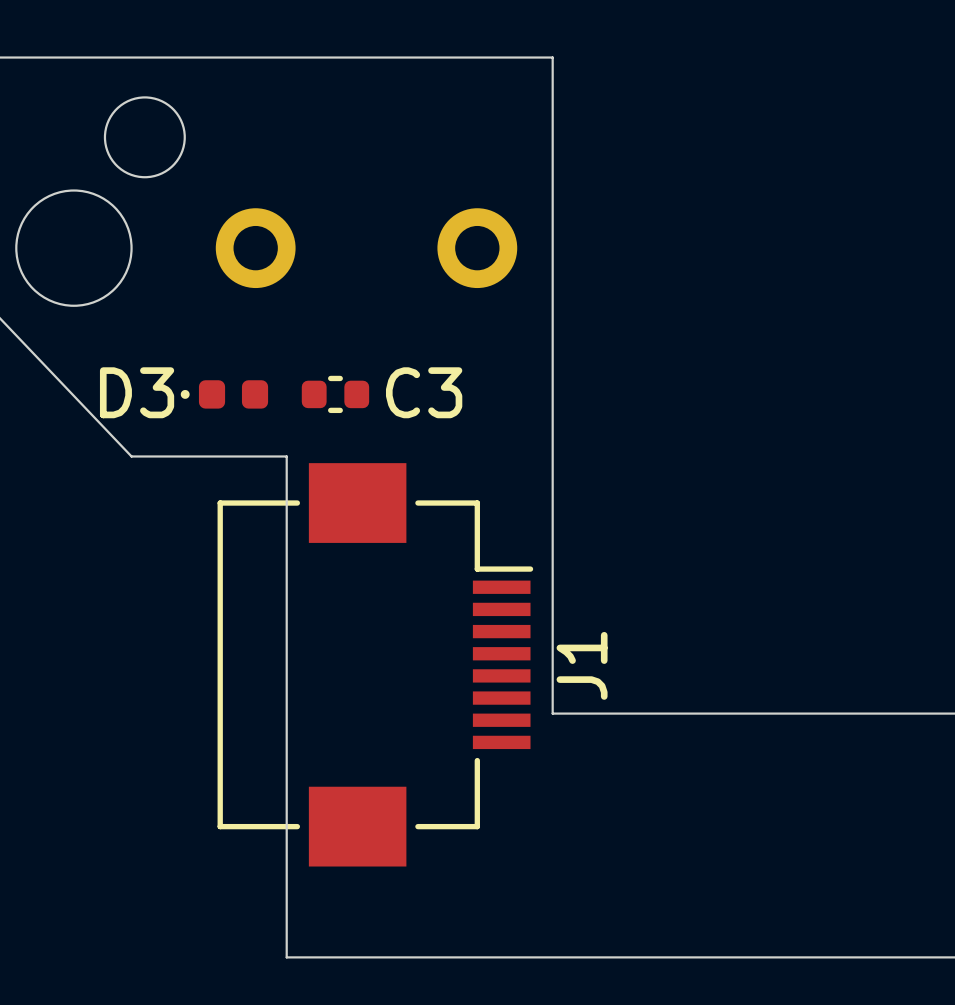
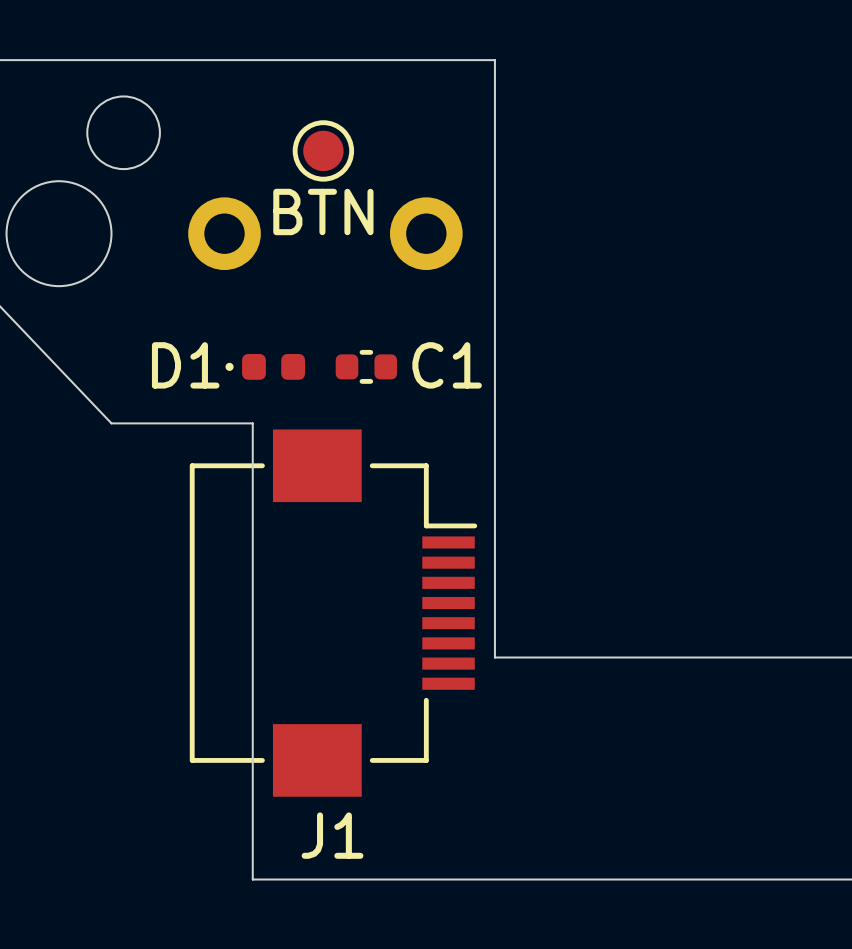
part: none -> BTN (323, 150)
D3: (224, 394) -> none
D1: none -> (265, 366)
C3: (335, 394) -> none
C1: none -> (366, 366)
J1 name rotation: 0° (582, 665) -> 90° clockwise (332, 835)
J1 name position: J1 (582, 665) -> J1 (332, 835)

